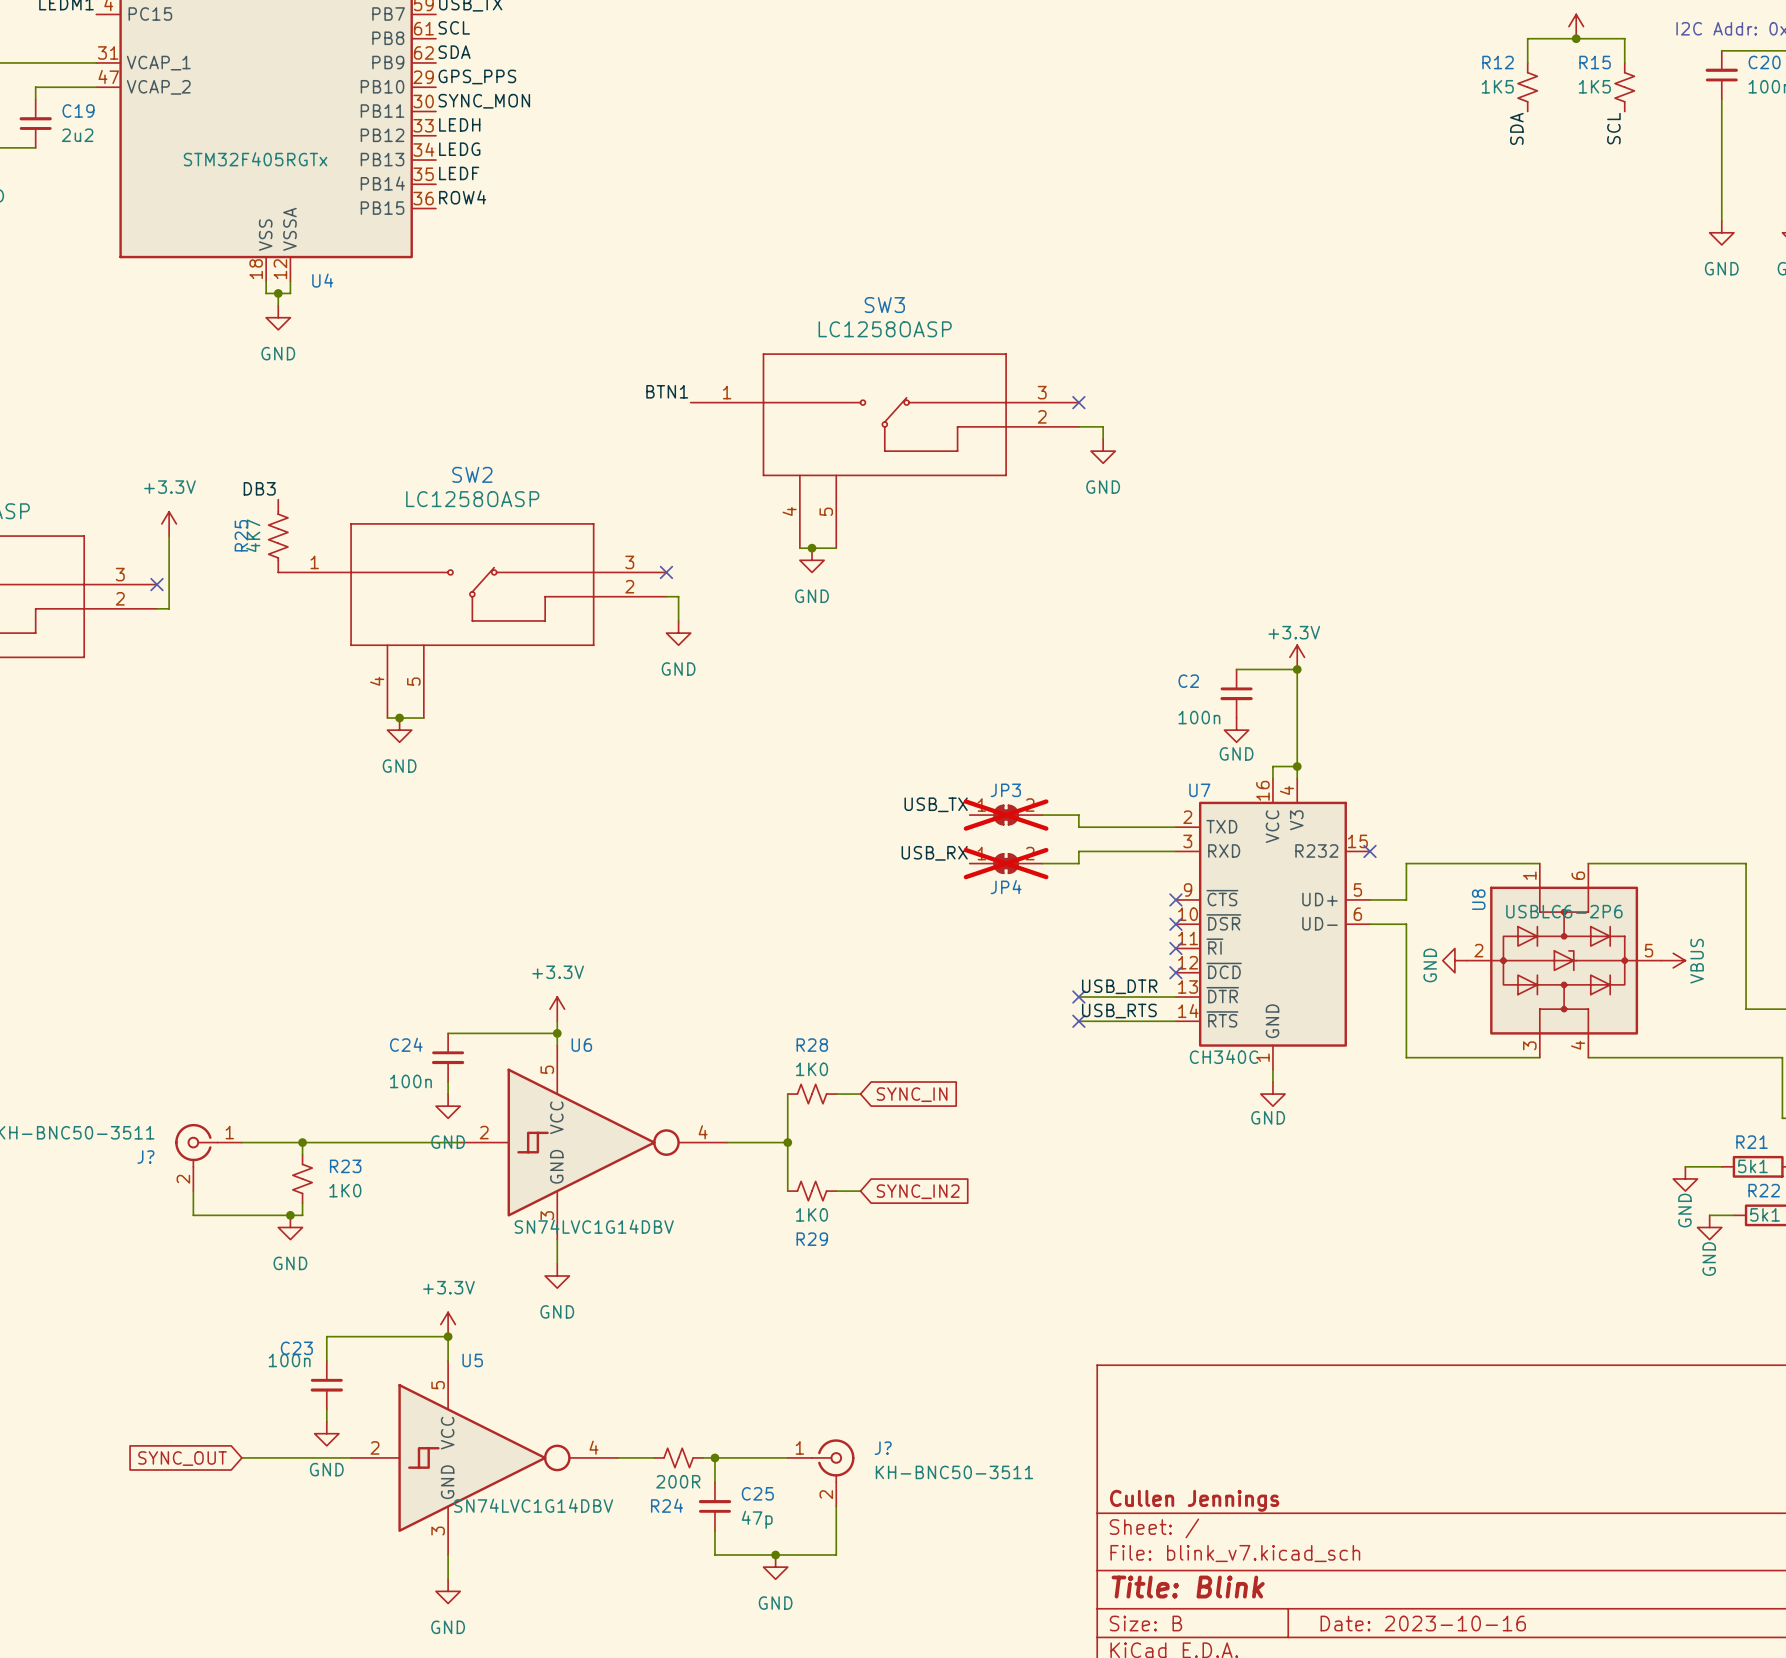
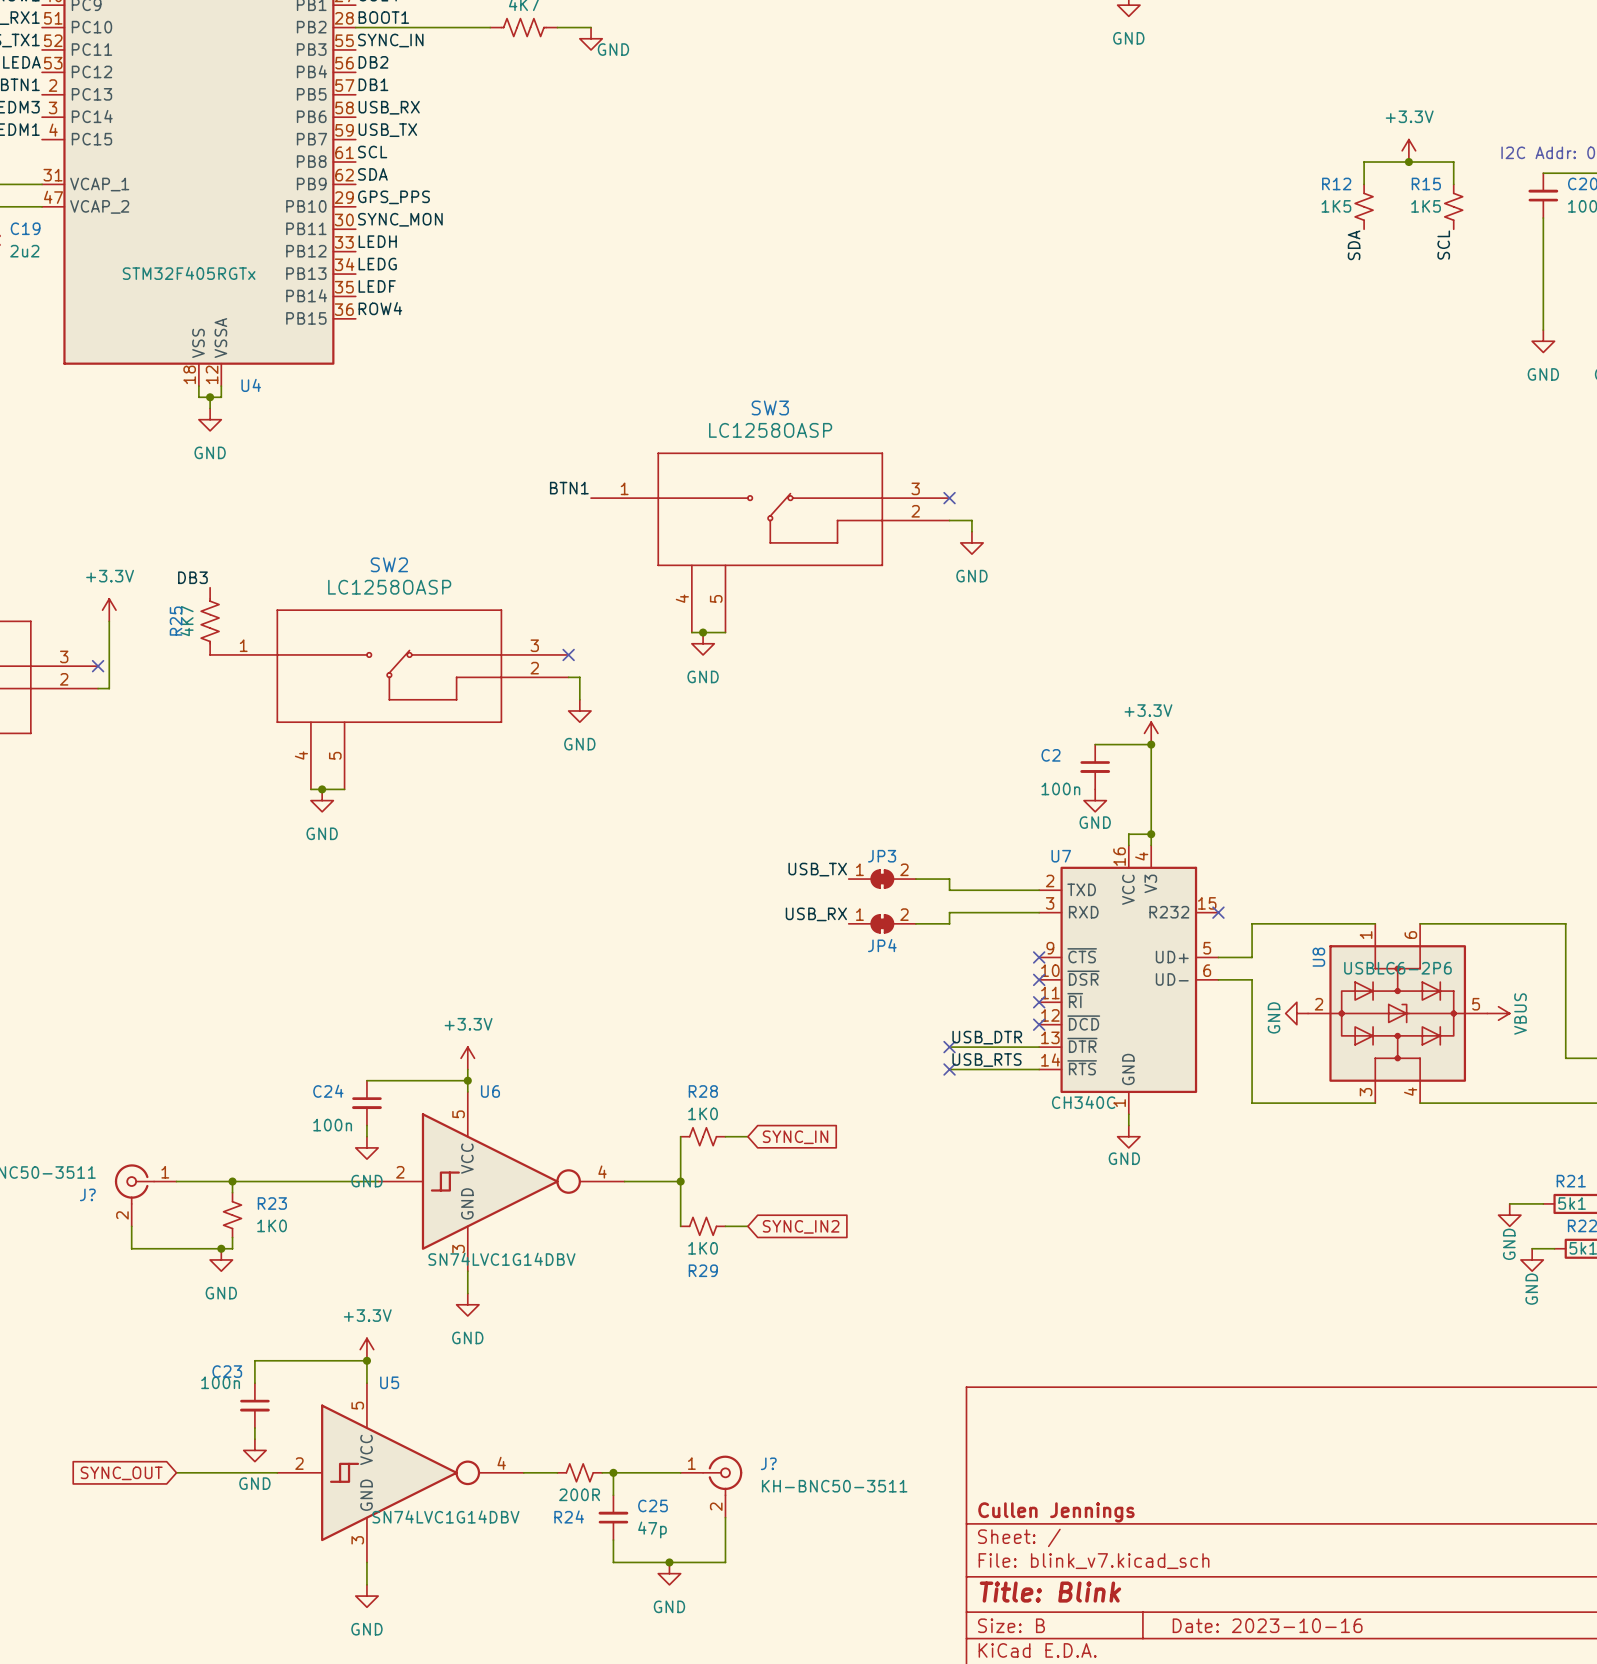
JP3 do-not-place cross: (1006, 815) -> none
JP4 do-not-place cross: (1006, 863) -> none

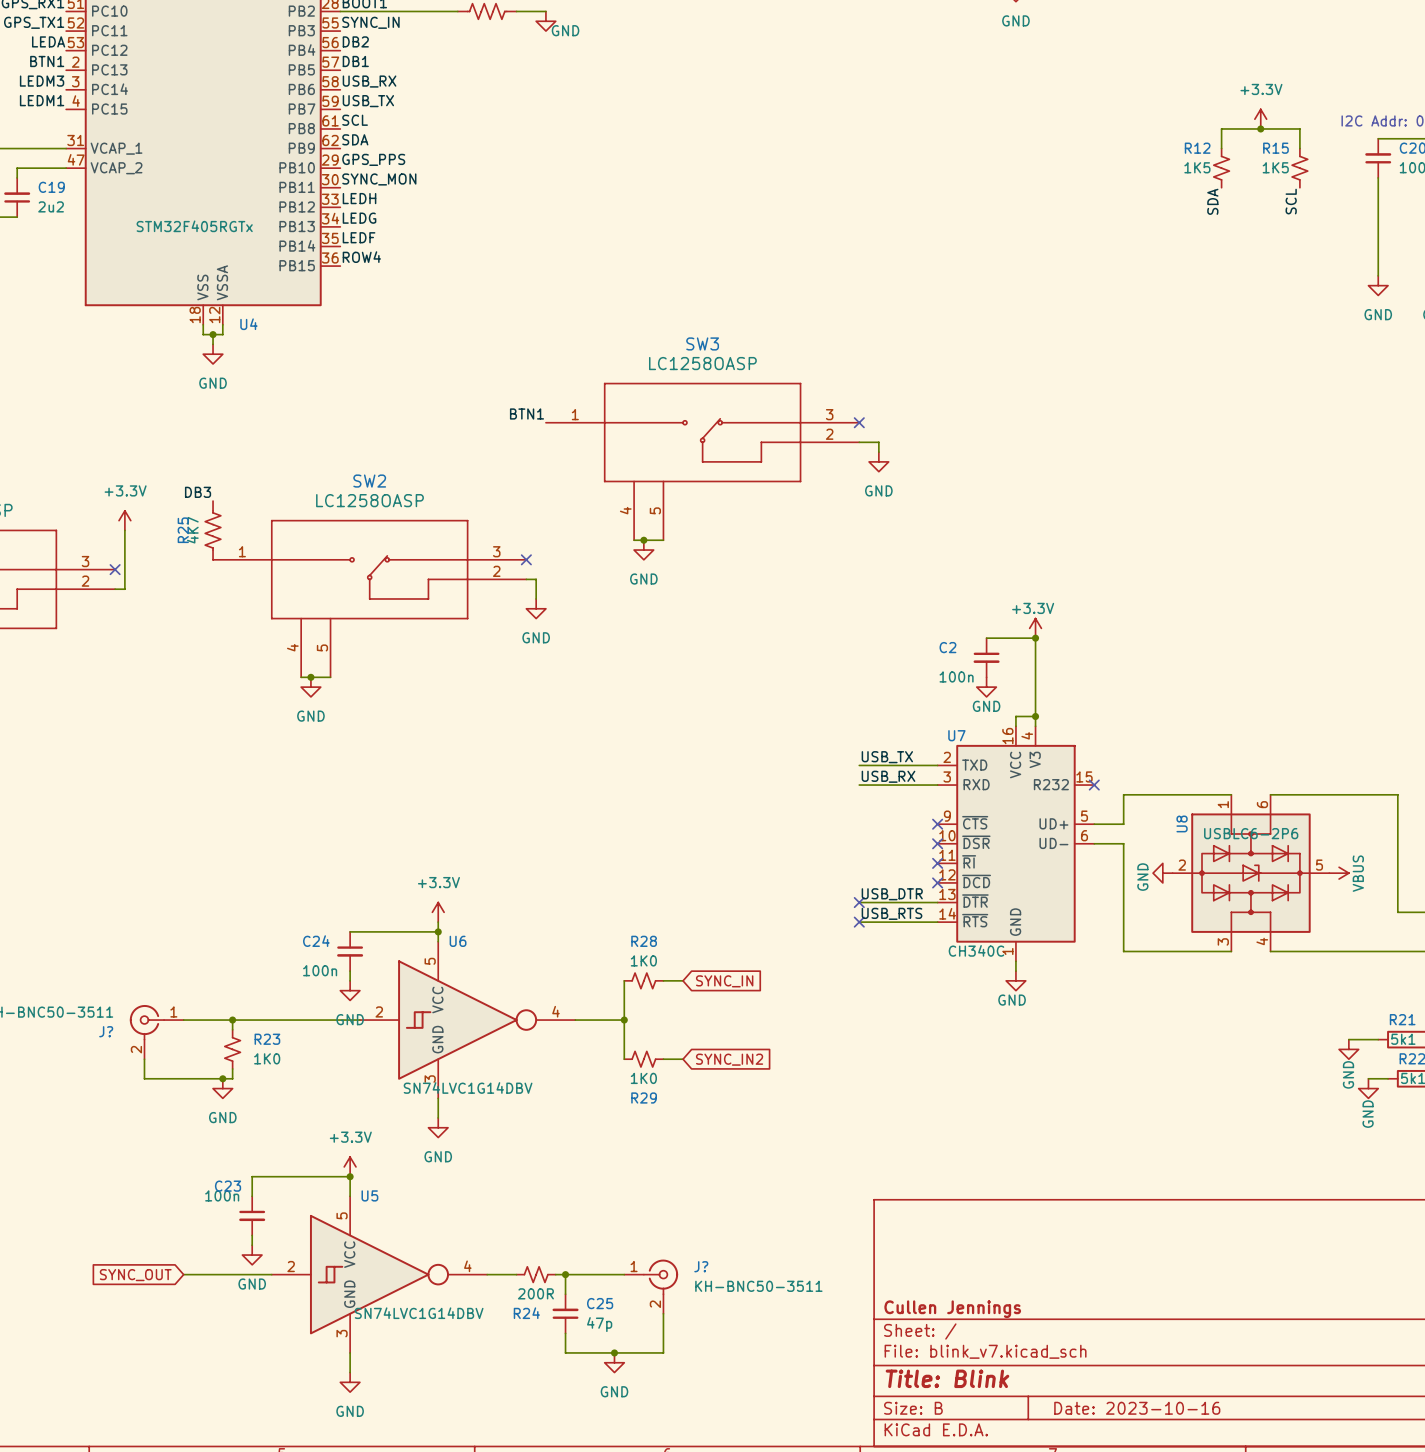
label position: USB_TX (817, 869) -> USB_TX (887, 757)
JP3: (882, 879) -> none
wire: (915, 879) (949, 879) (949, 890) -> none
wire: (949, 912) (949, 923) (915, 923) -> none
label position: USB_RX (816, 914) -> USB_RX (888, 776)
JP4: (882, 923) -> none

